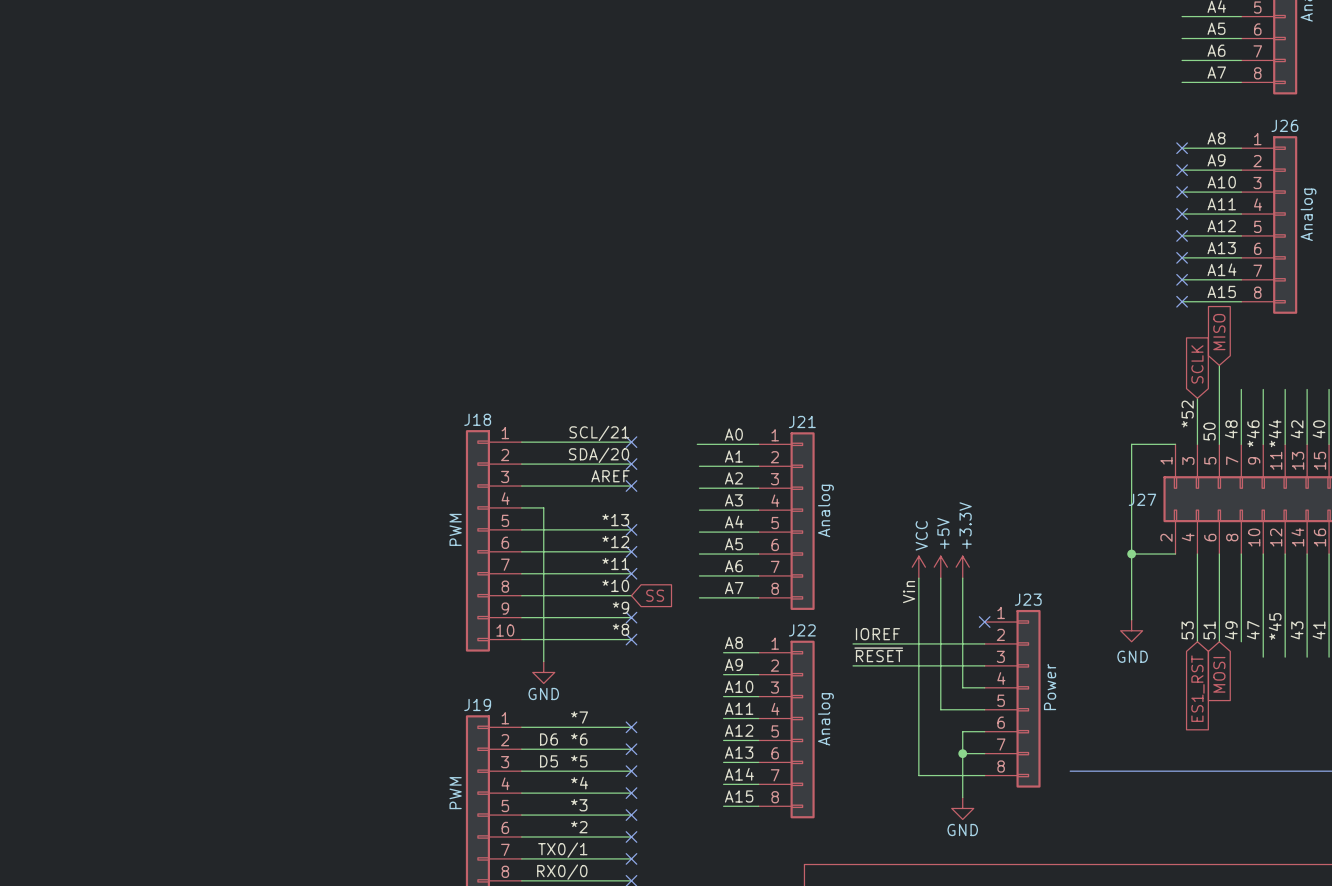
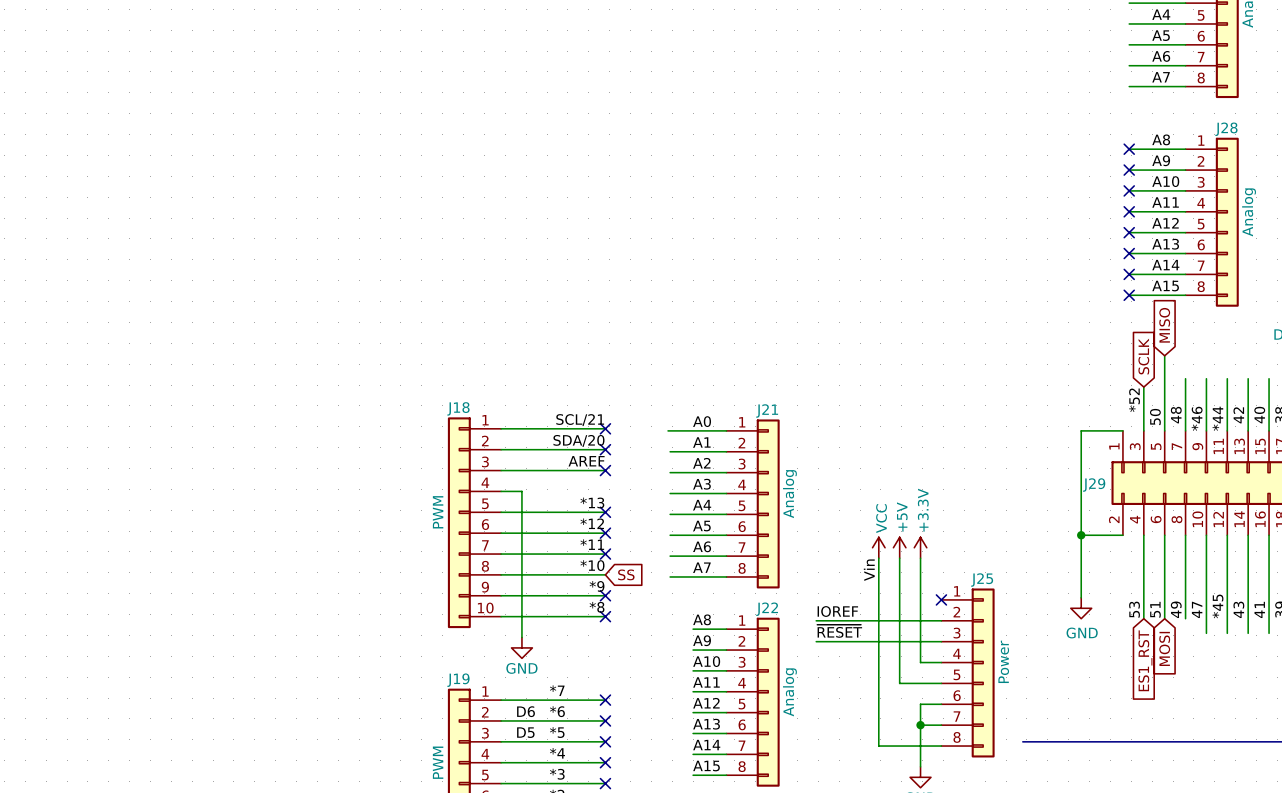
J26 name: J26 (1284, 125) -> J28 (1226, 129)
J27 name: J27 (1142, 499) -> J29 (1094, 485)
J23 name: J23 (1028, 599) -> J25 (982, 580)

